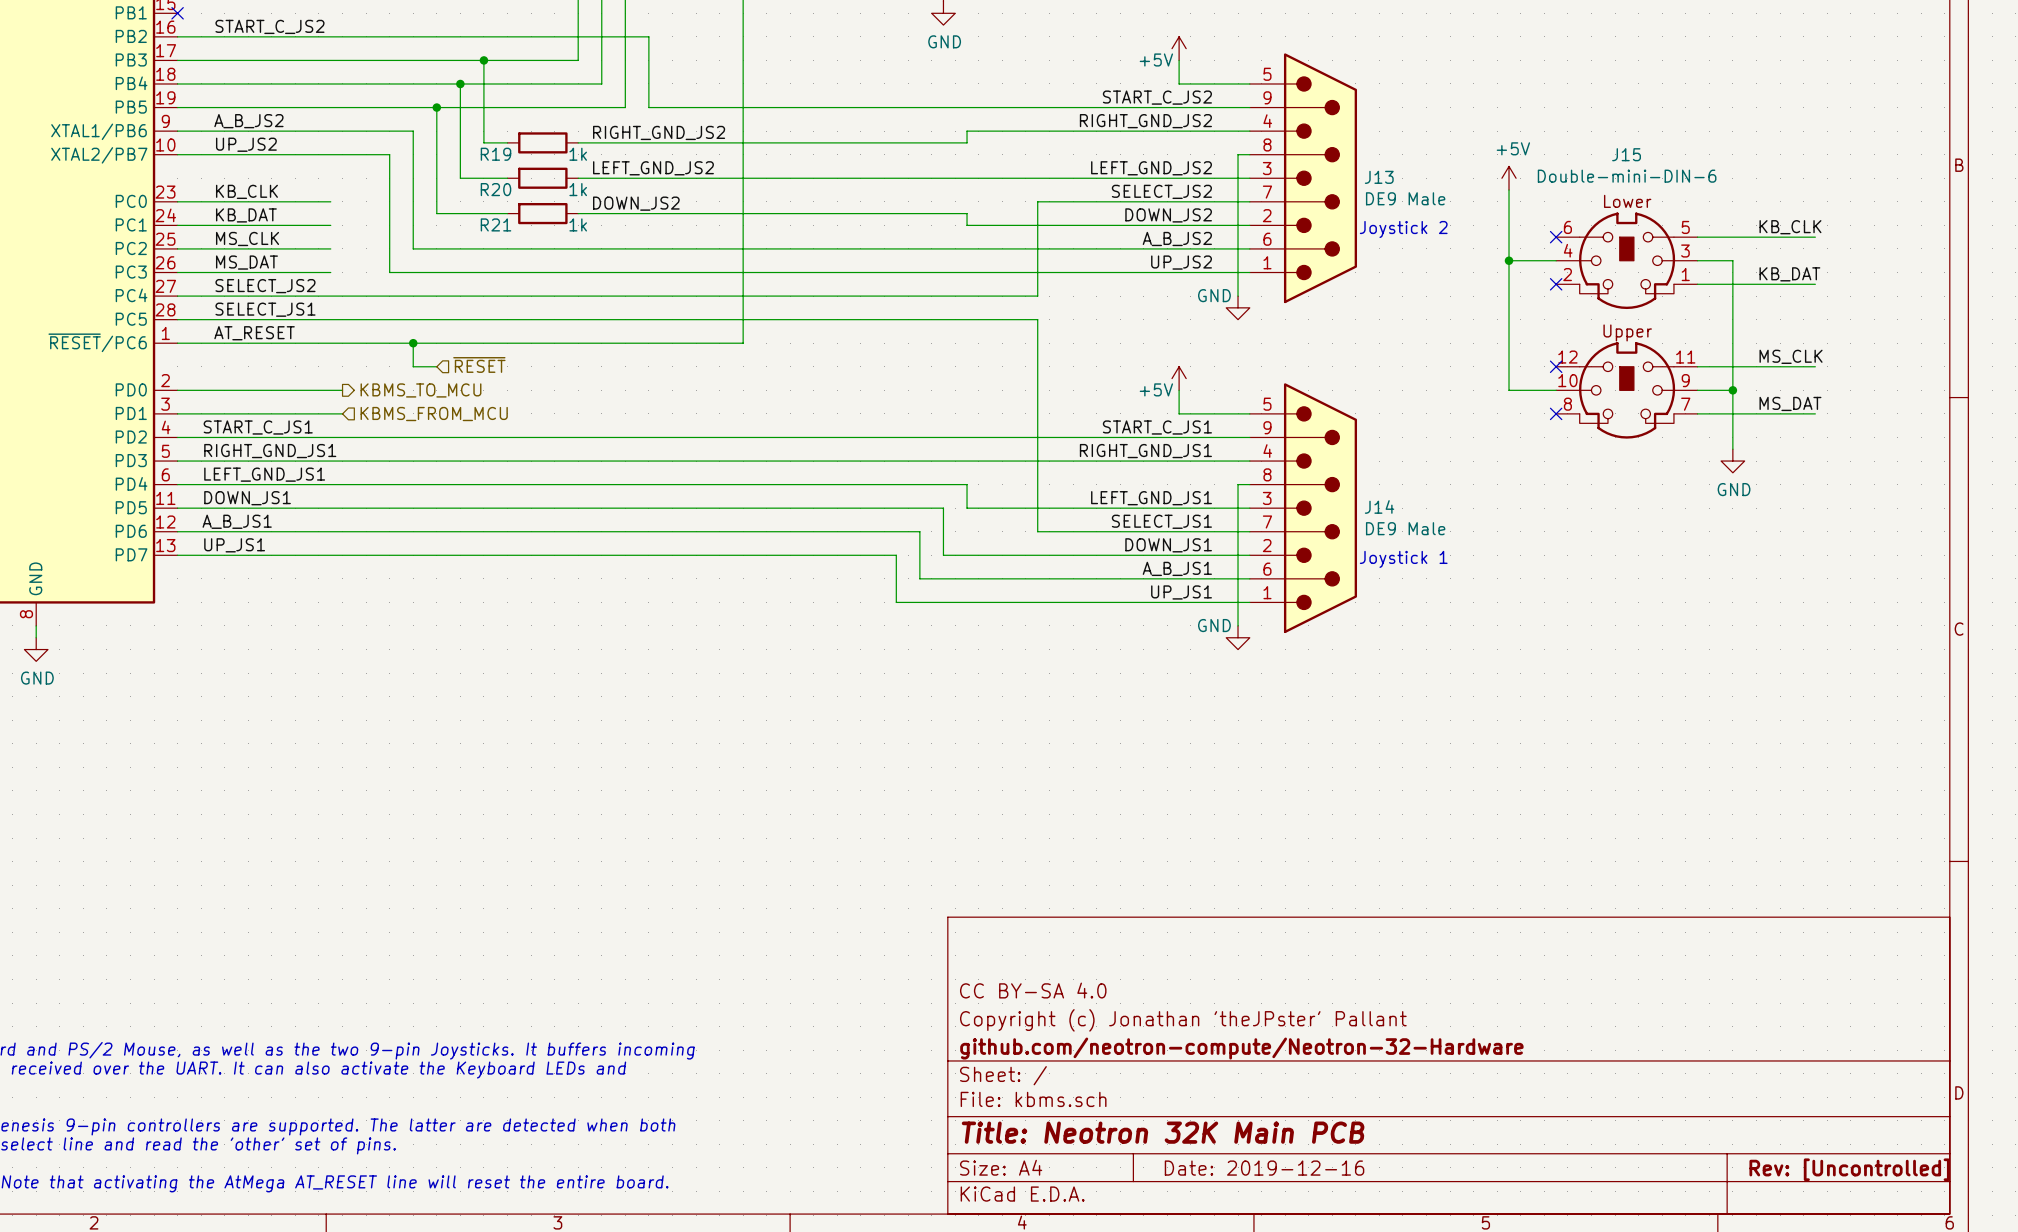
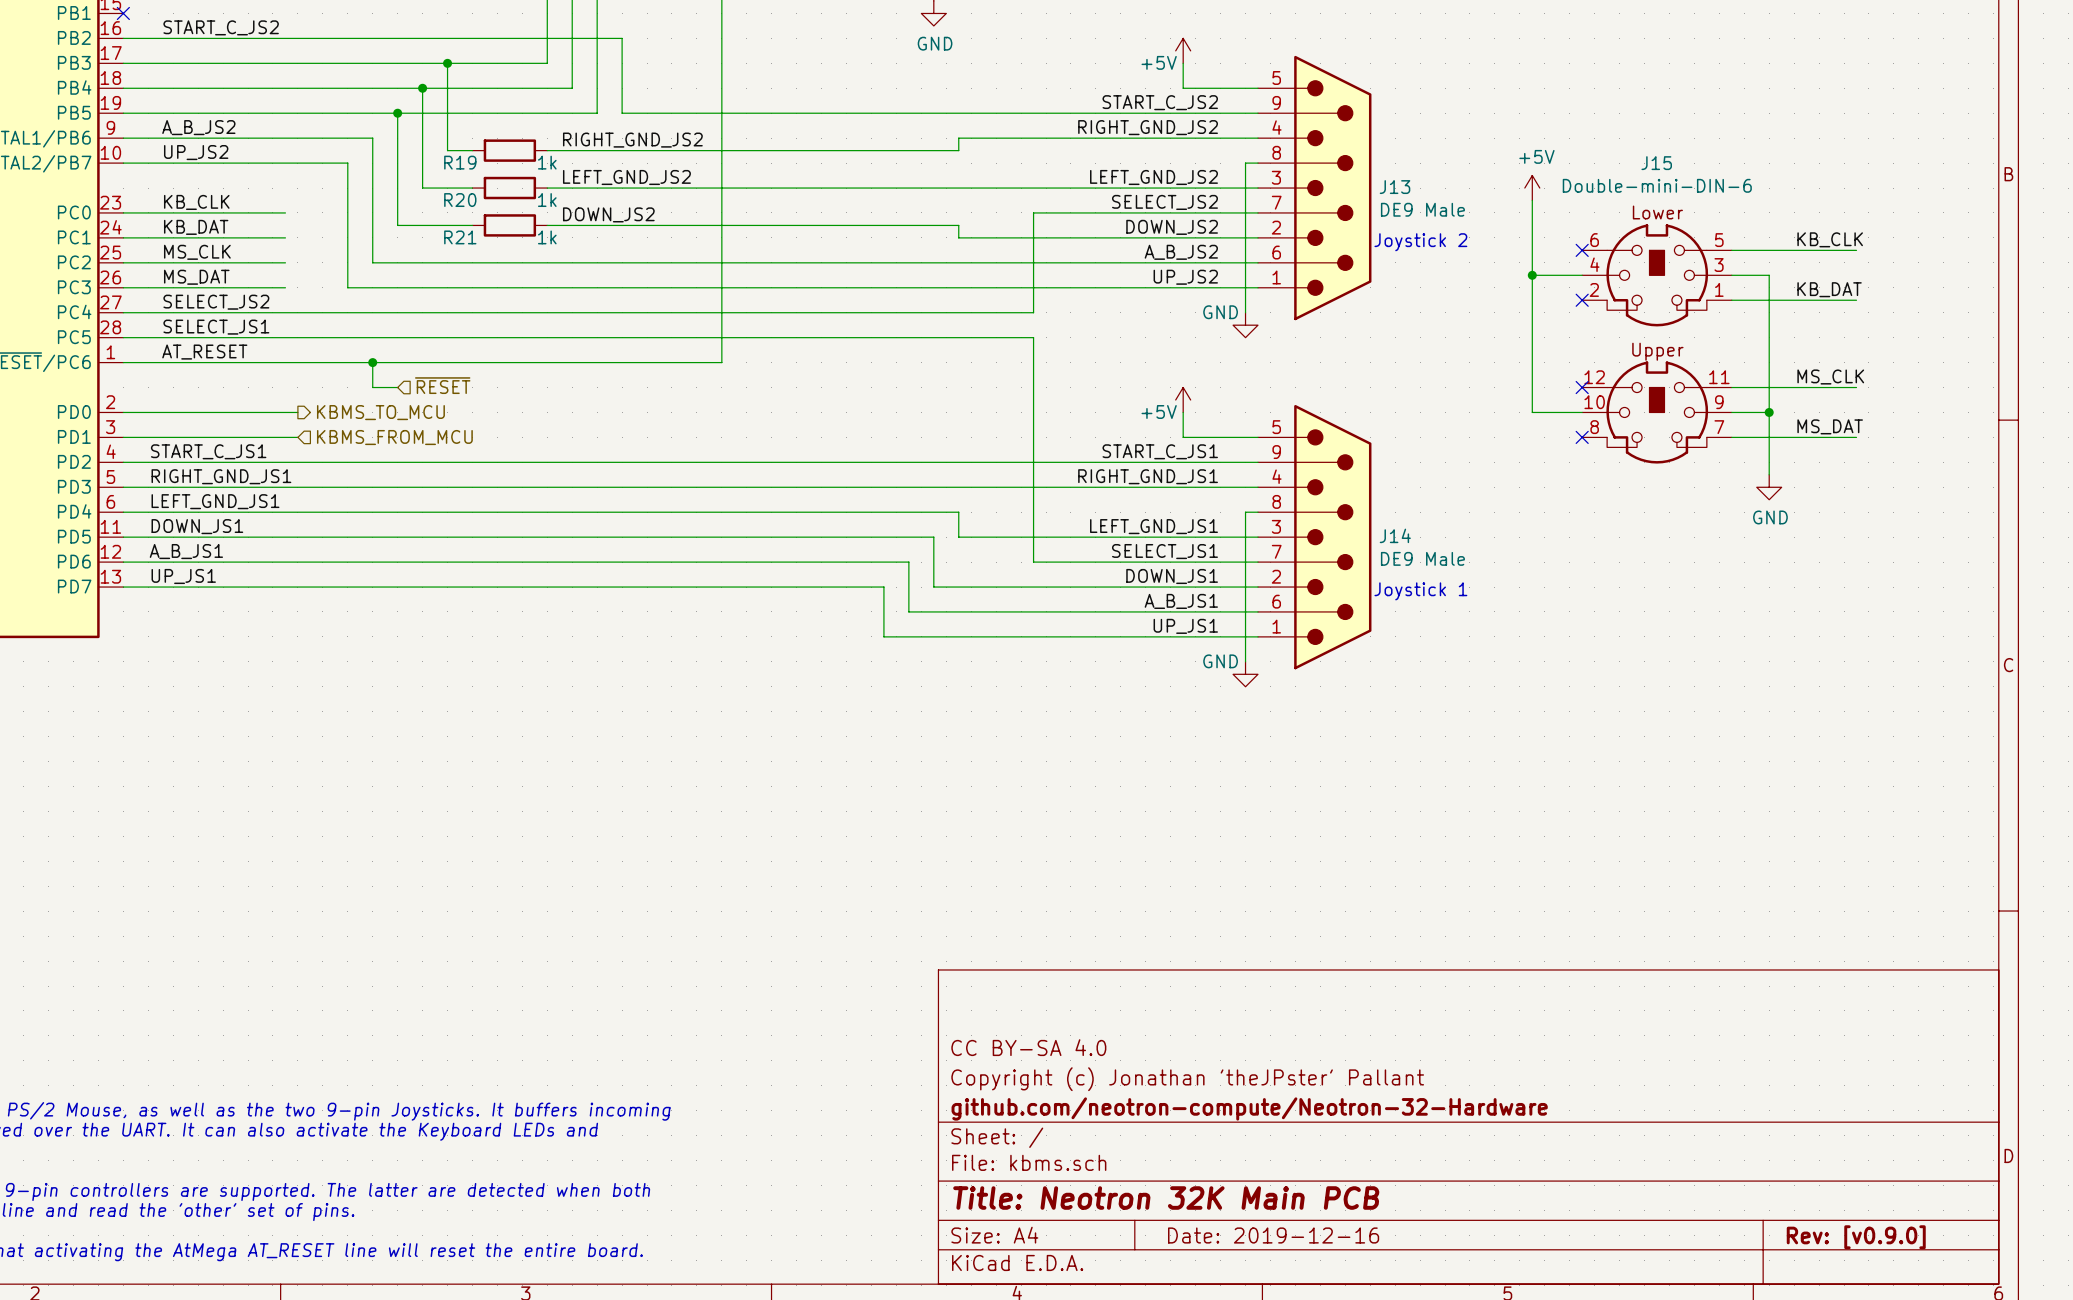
title block: Rev: [Uncontrolled] (1849, 1169) -> Rev: [v0.9.0] (1856, 1237)

